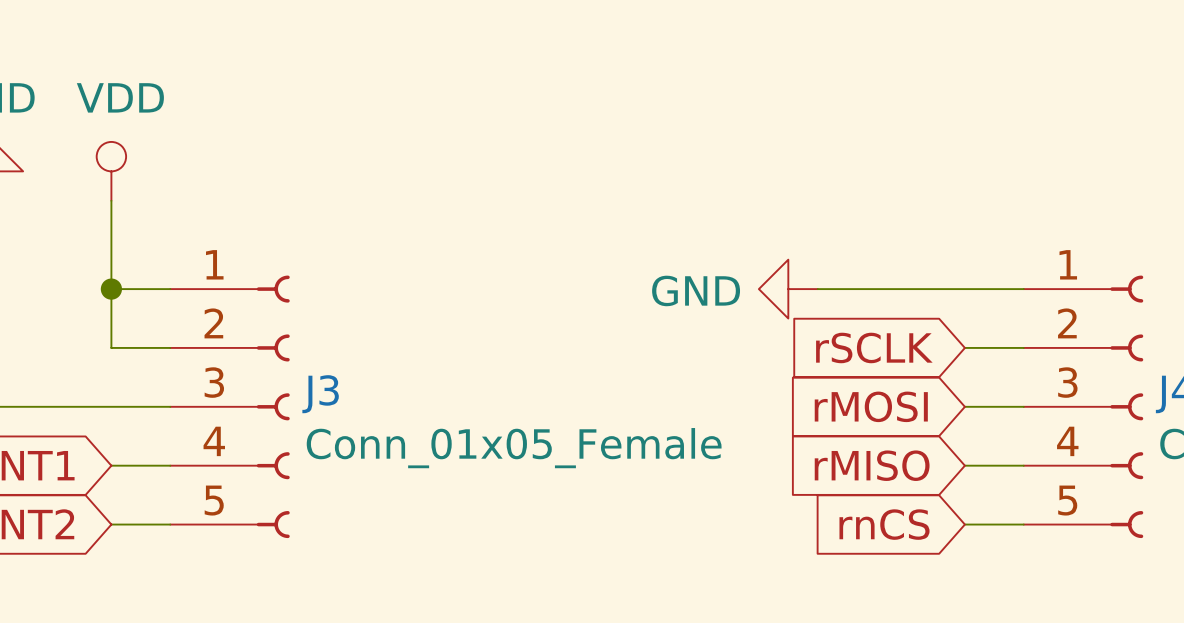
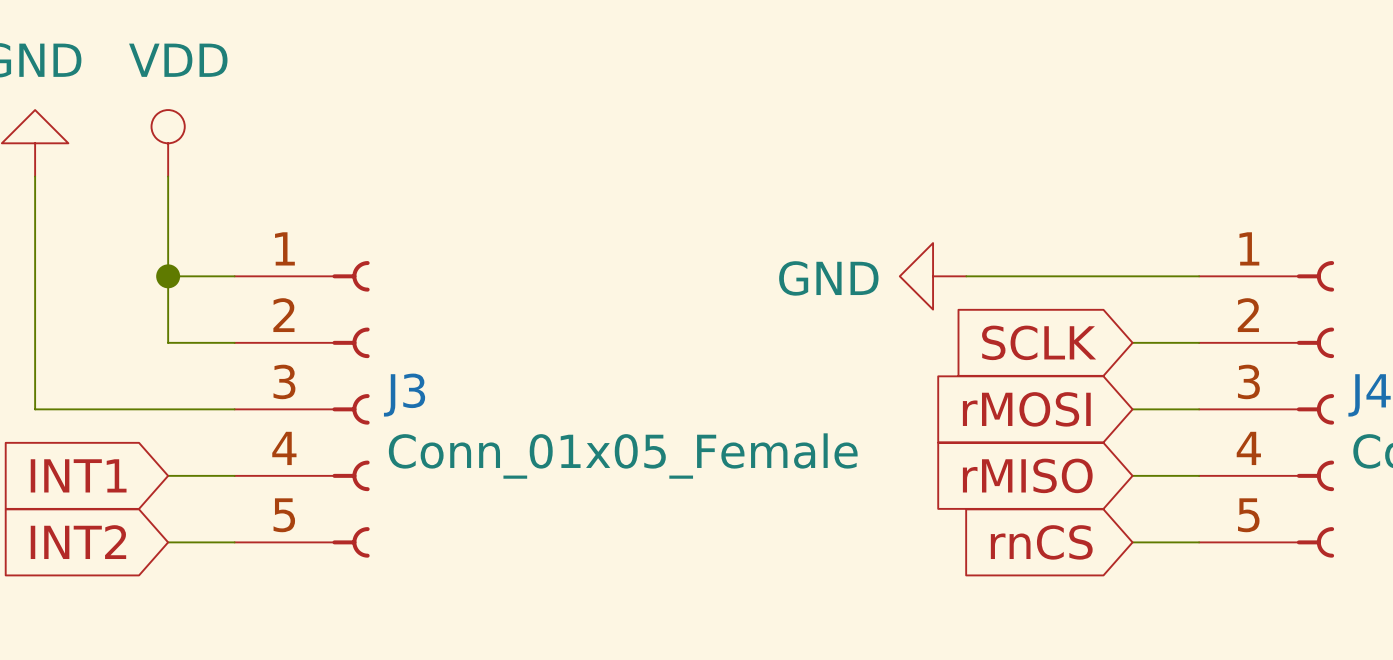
global label: rSCLK (874, 347) -> SCLK (1039, 342)

